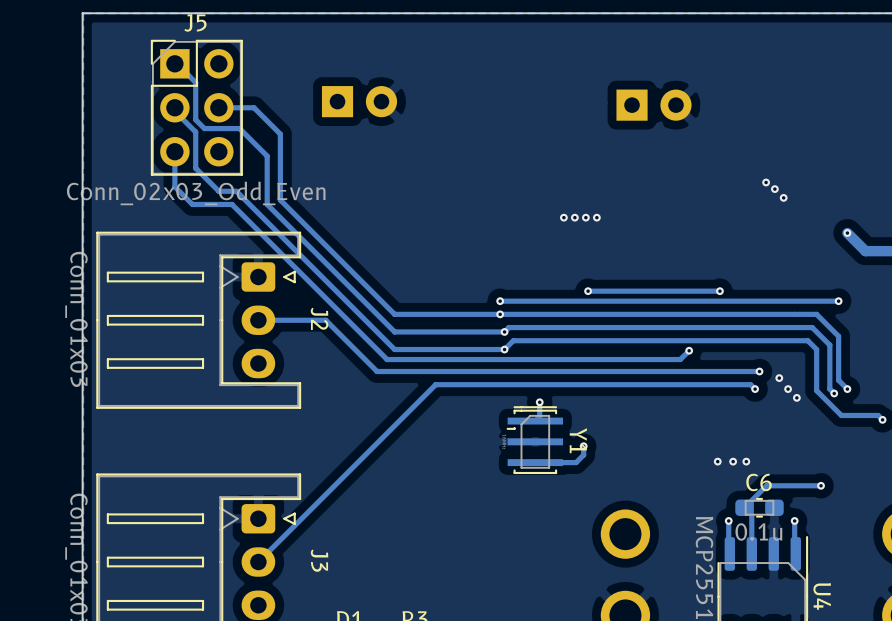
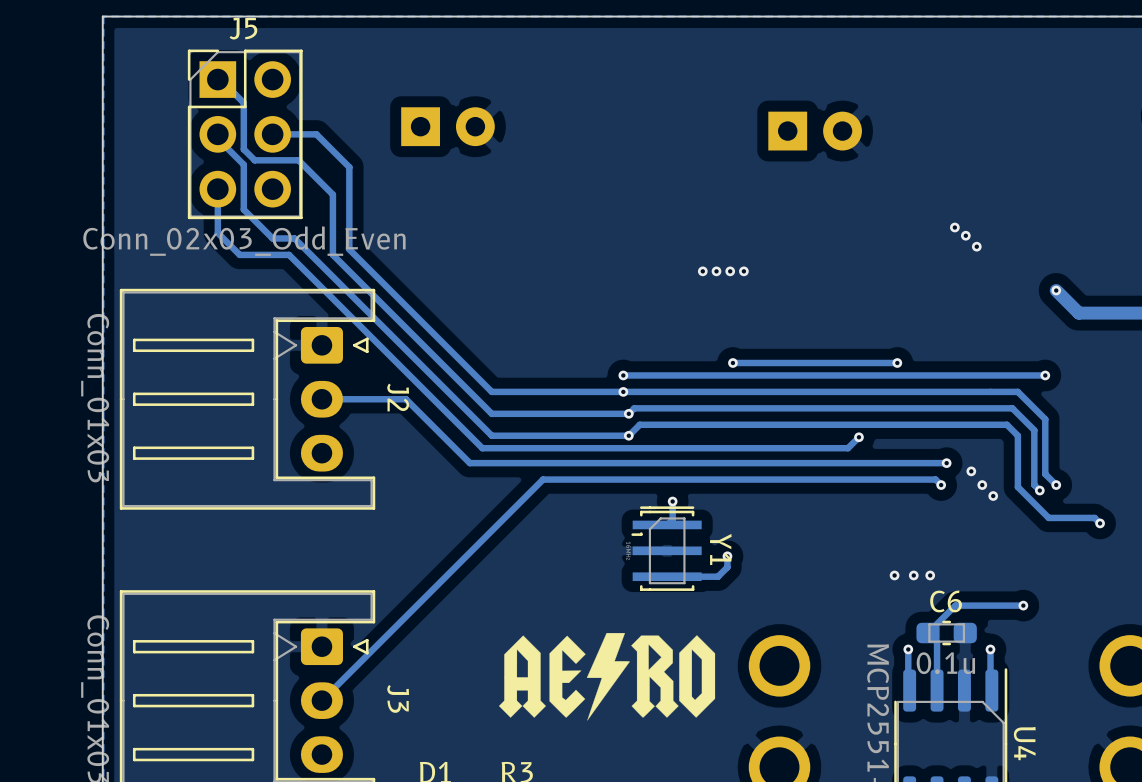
drawing: none -> [498, 633, 716, 721]

